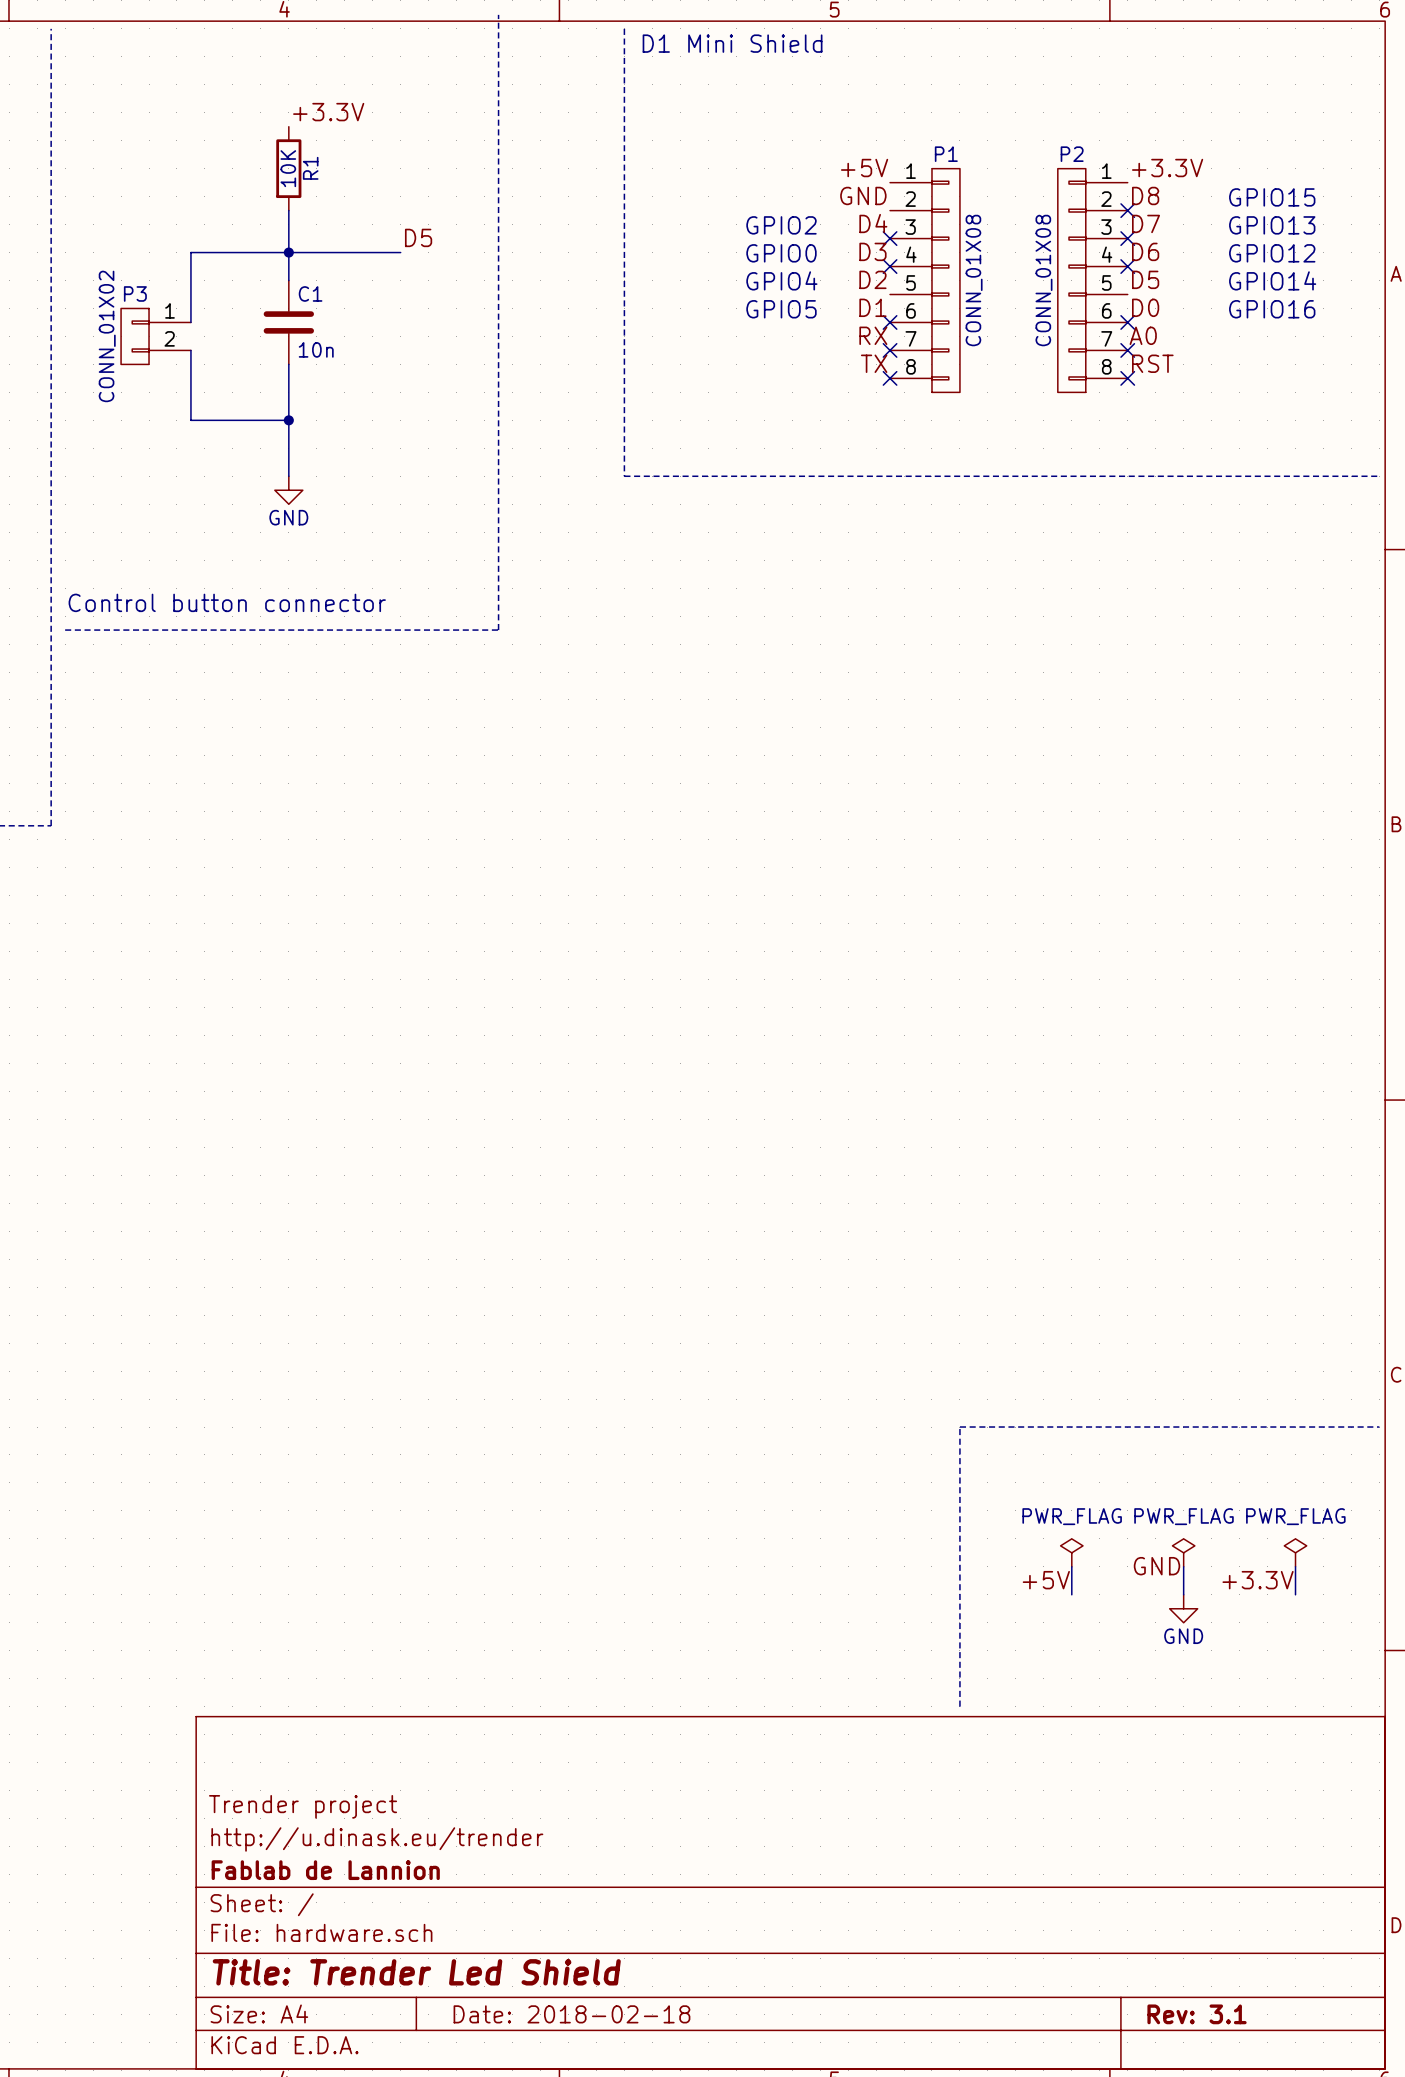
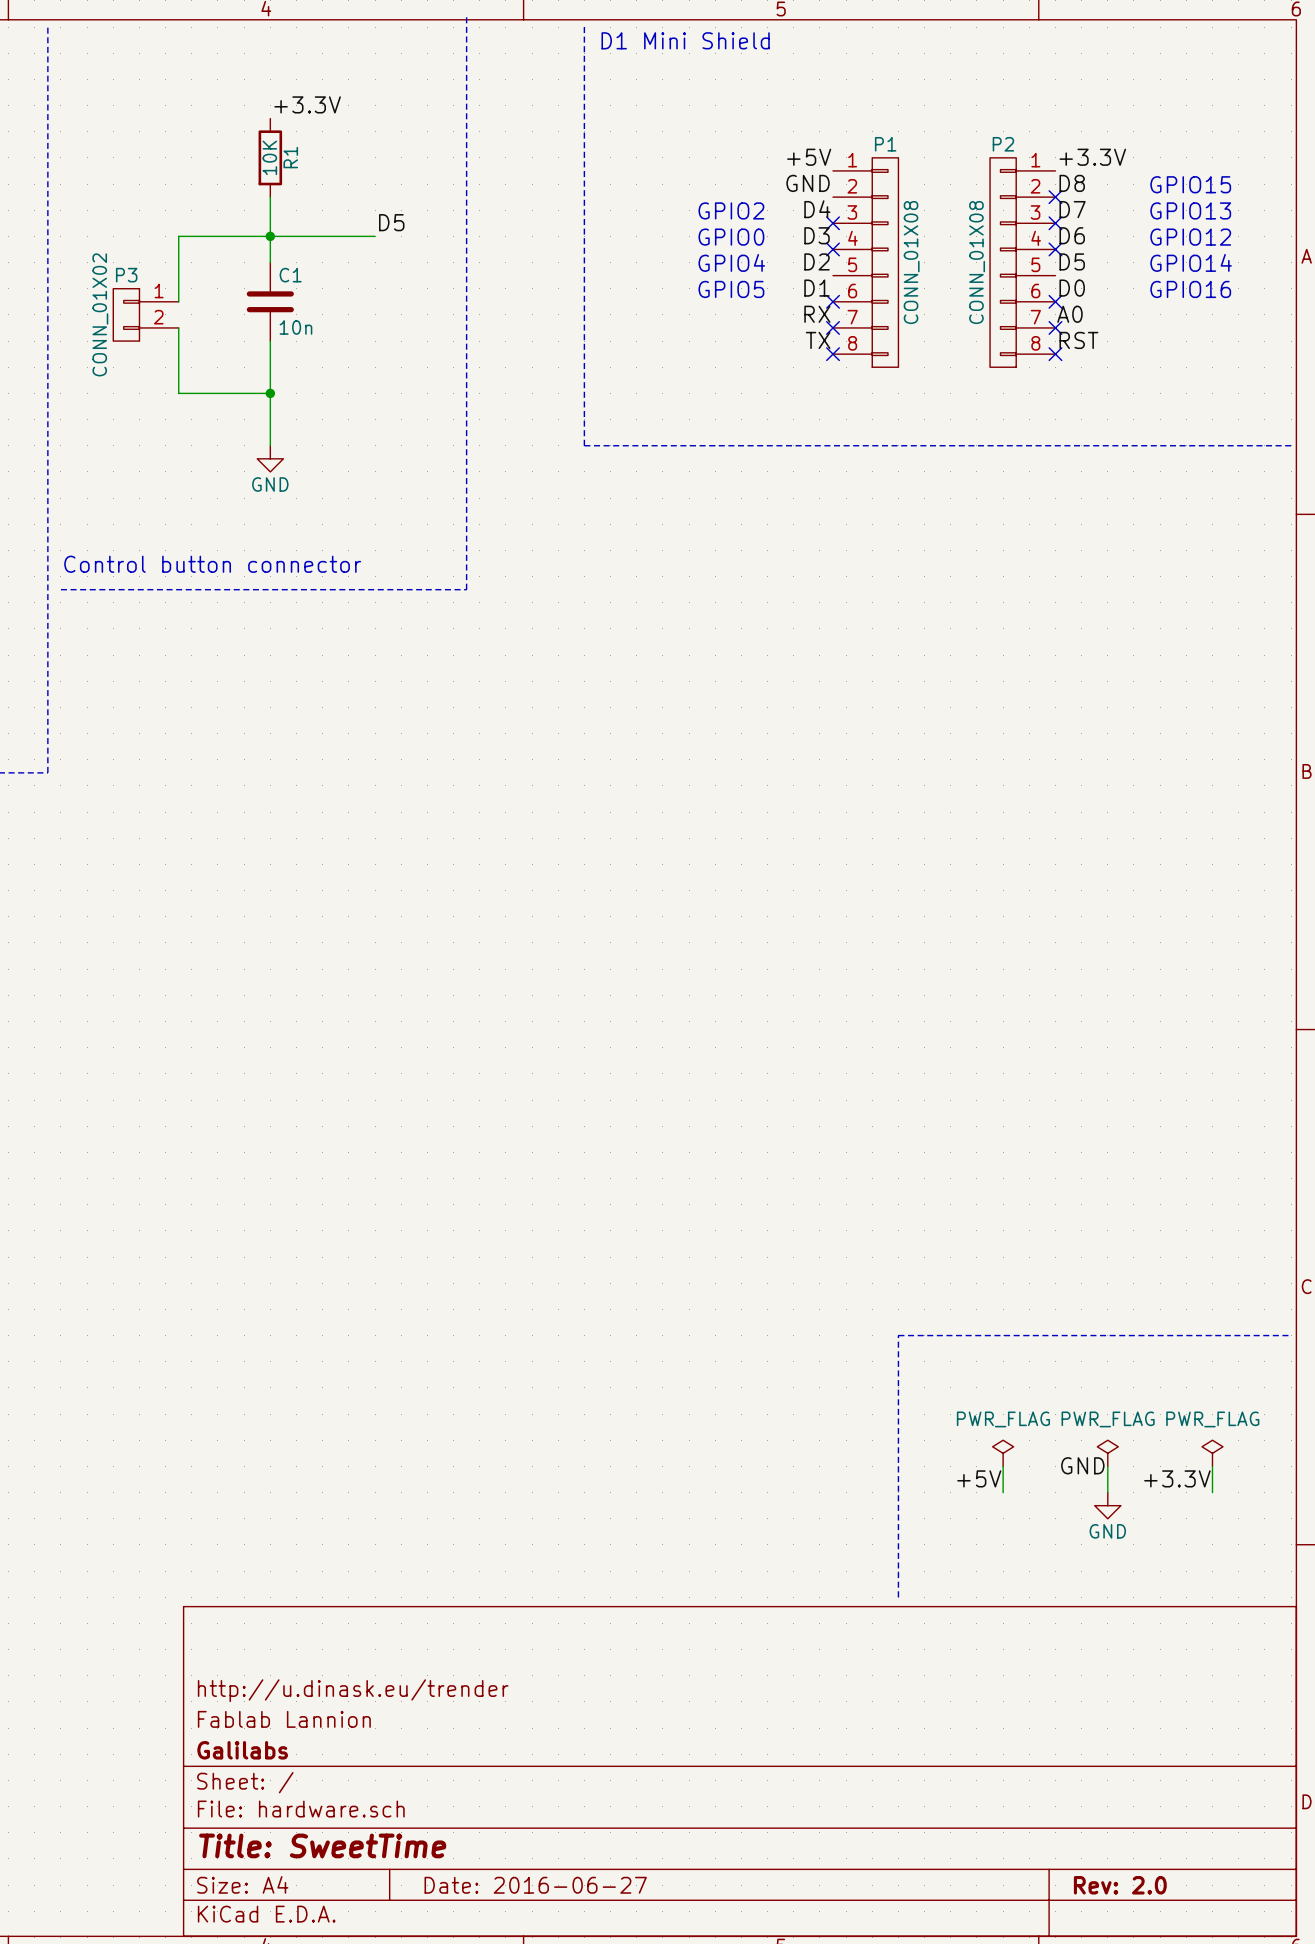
title block: Trender project (303, 1806) -> http://u.dinask.eu/trender (353, 1690)
title block: http://u.dinask.eu/trender (377, 1839) -> Fablab Lannion (284, 1719)
title block: Fablab de Lannion (325, 1870) -> Galilabs (242, 1750)
title block: Title: Trender Led Shield (416, 1972) -> Title: SweetTime (322, 1845)
title block: Date: 2018-02-18 (571, 2014) -> Date: 2016-06-27 (535, 1885)
title block: Rev: 3.1 (1197, 2014) -> Rev: 2.0 (1120, 1885)

